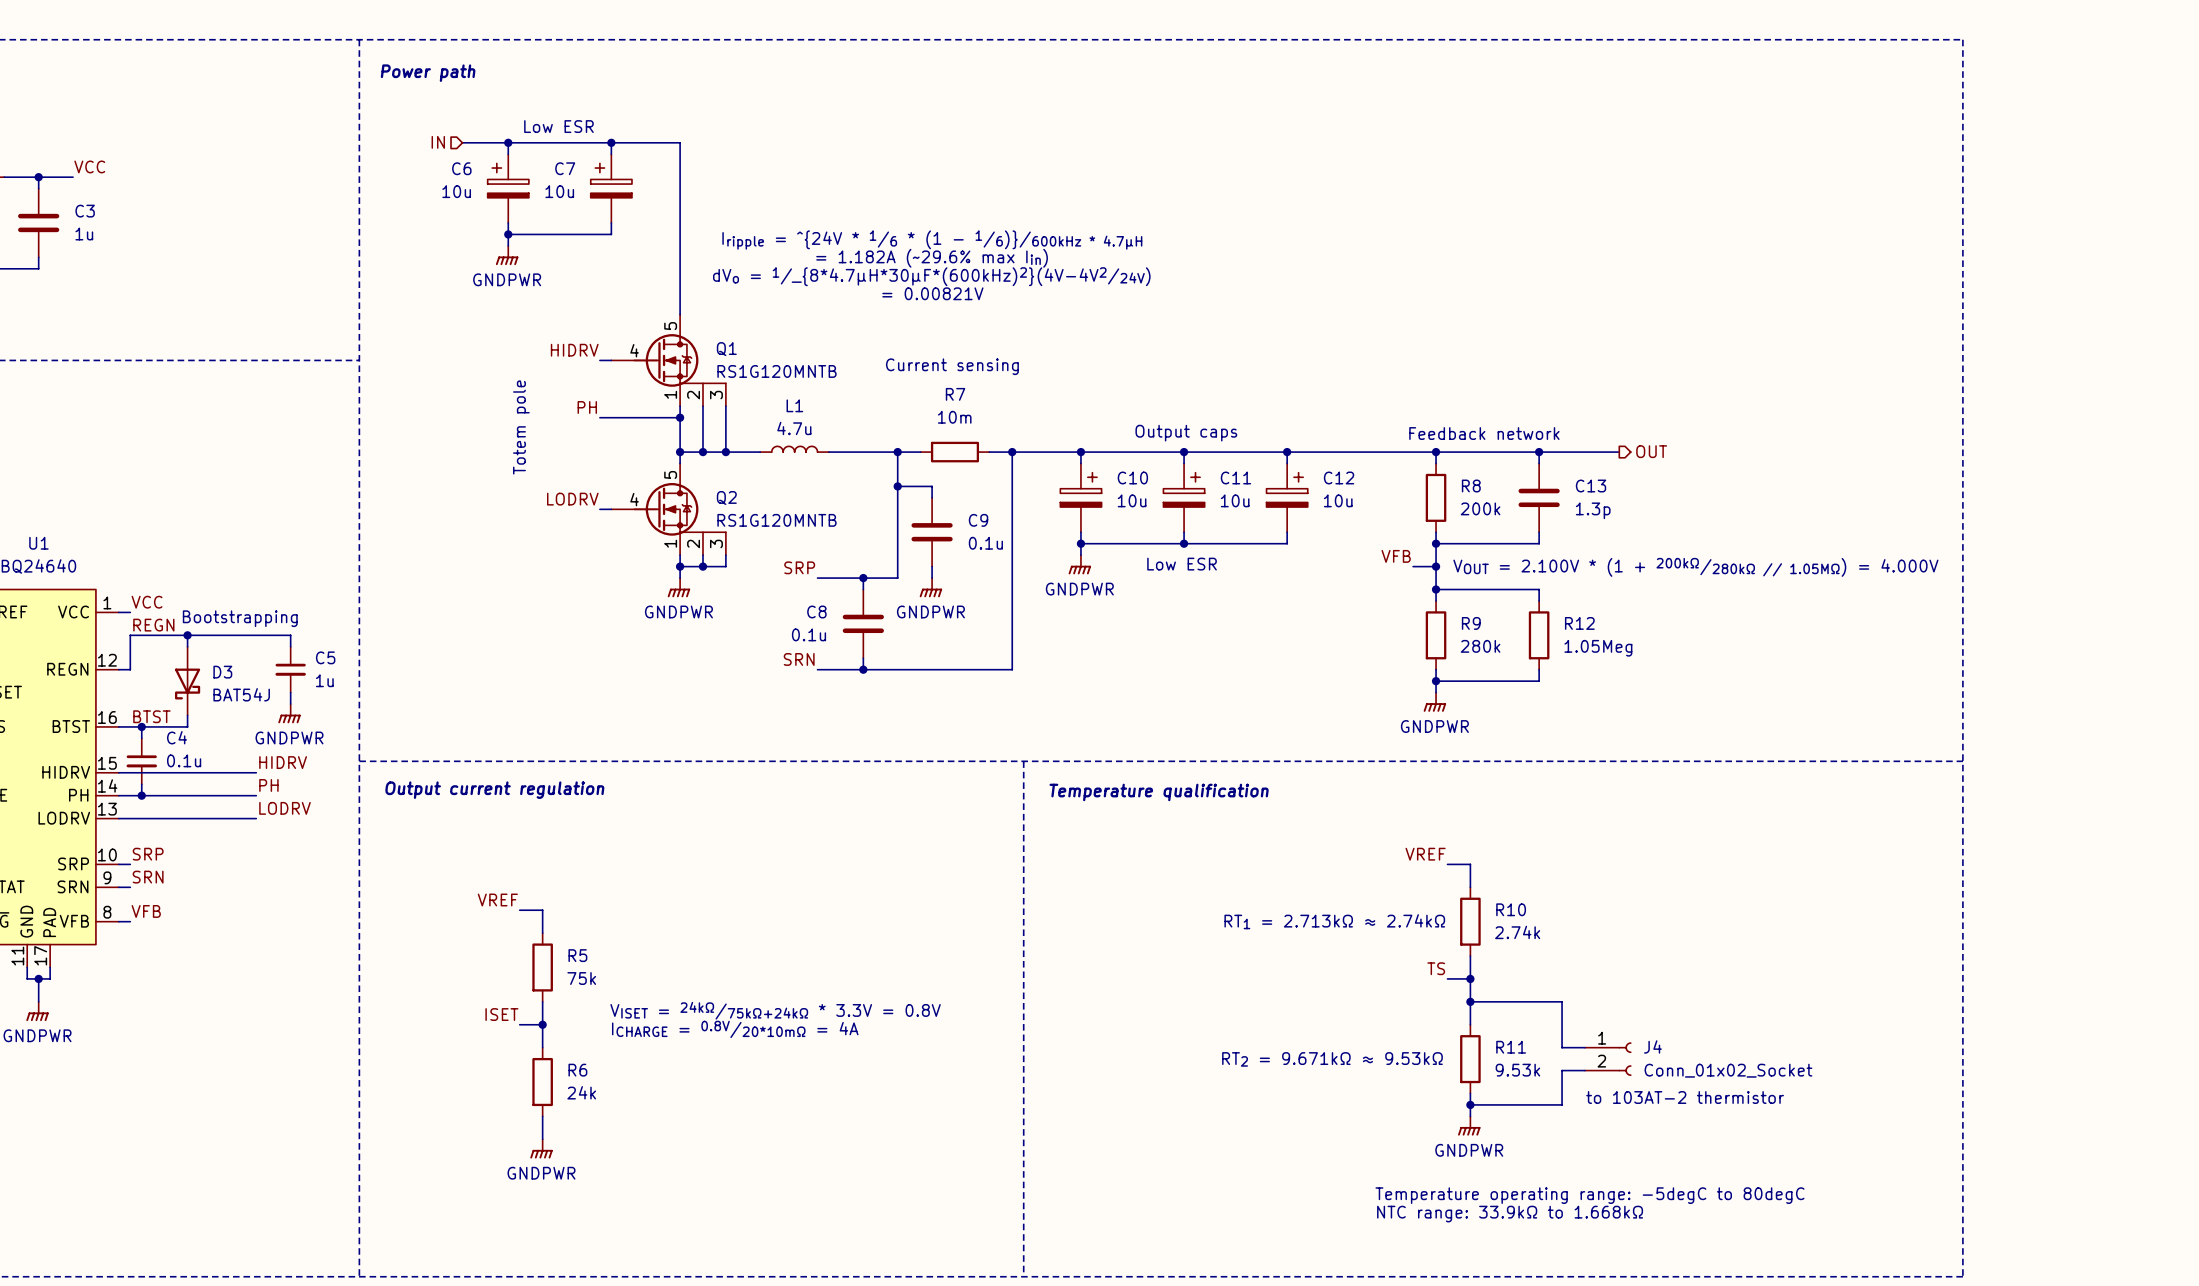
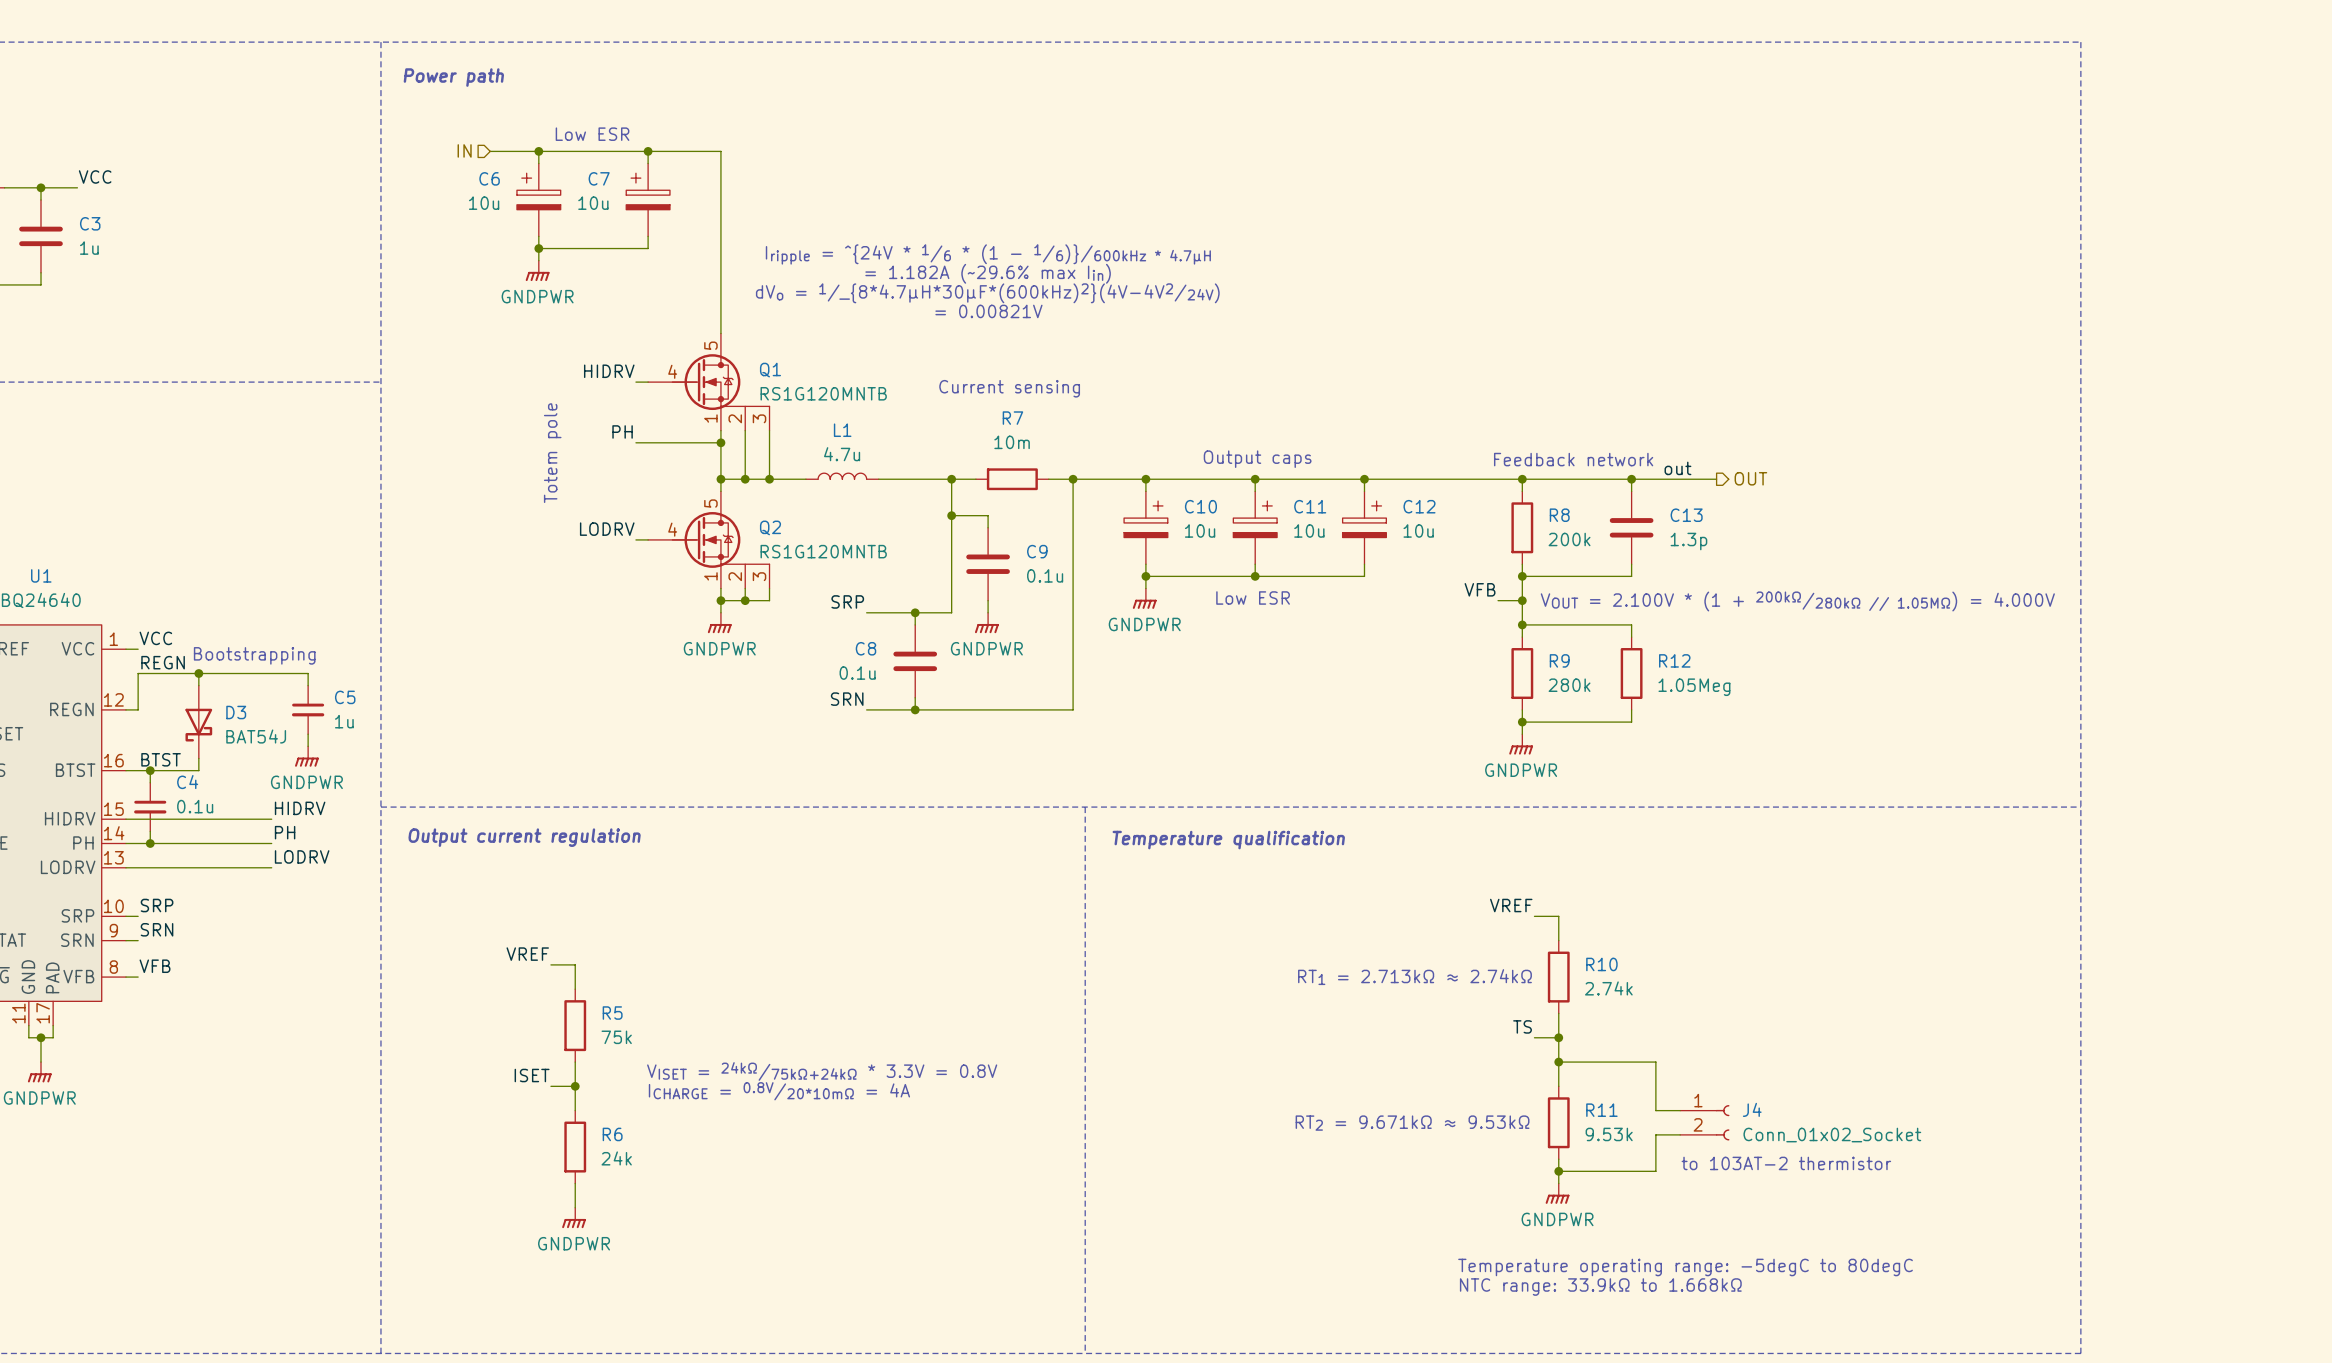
label: none -> out (1677, 468)

